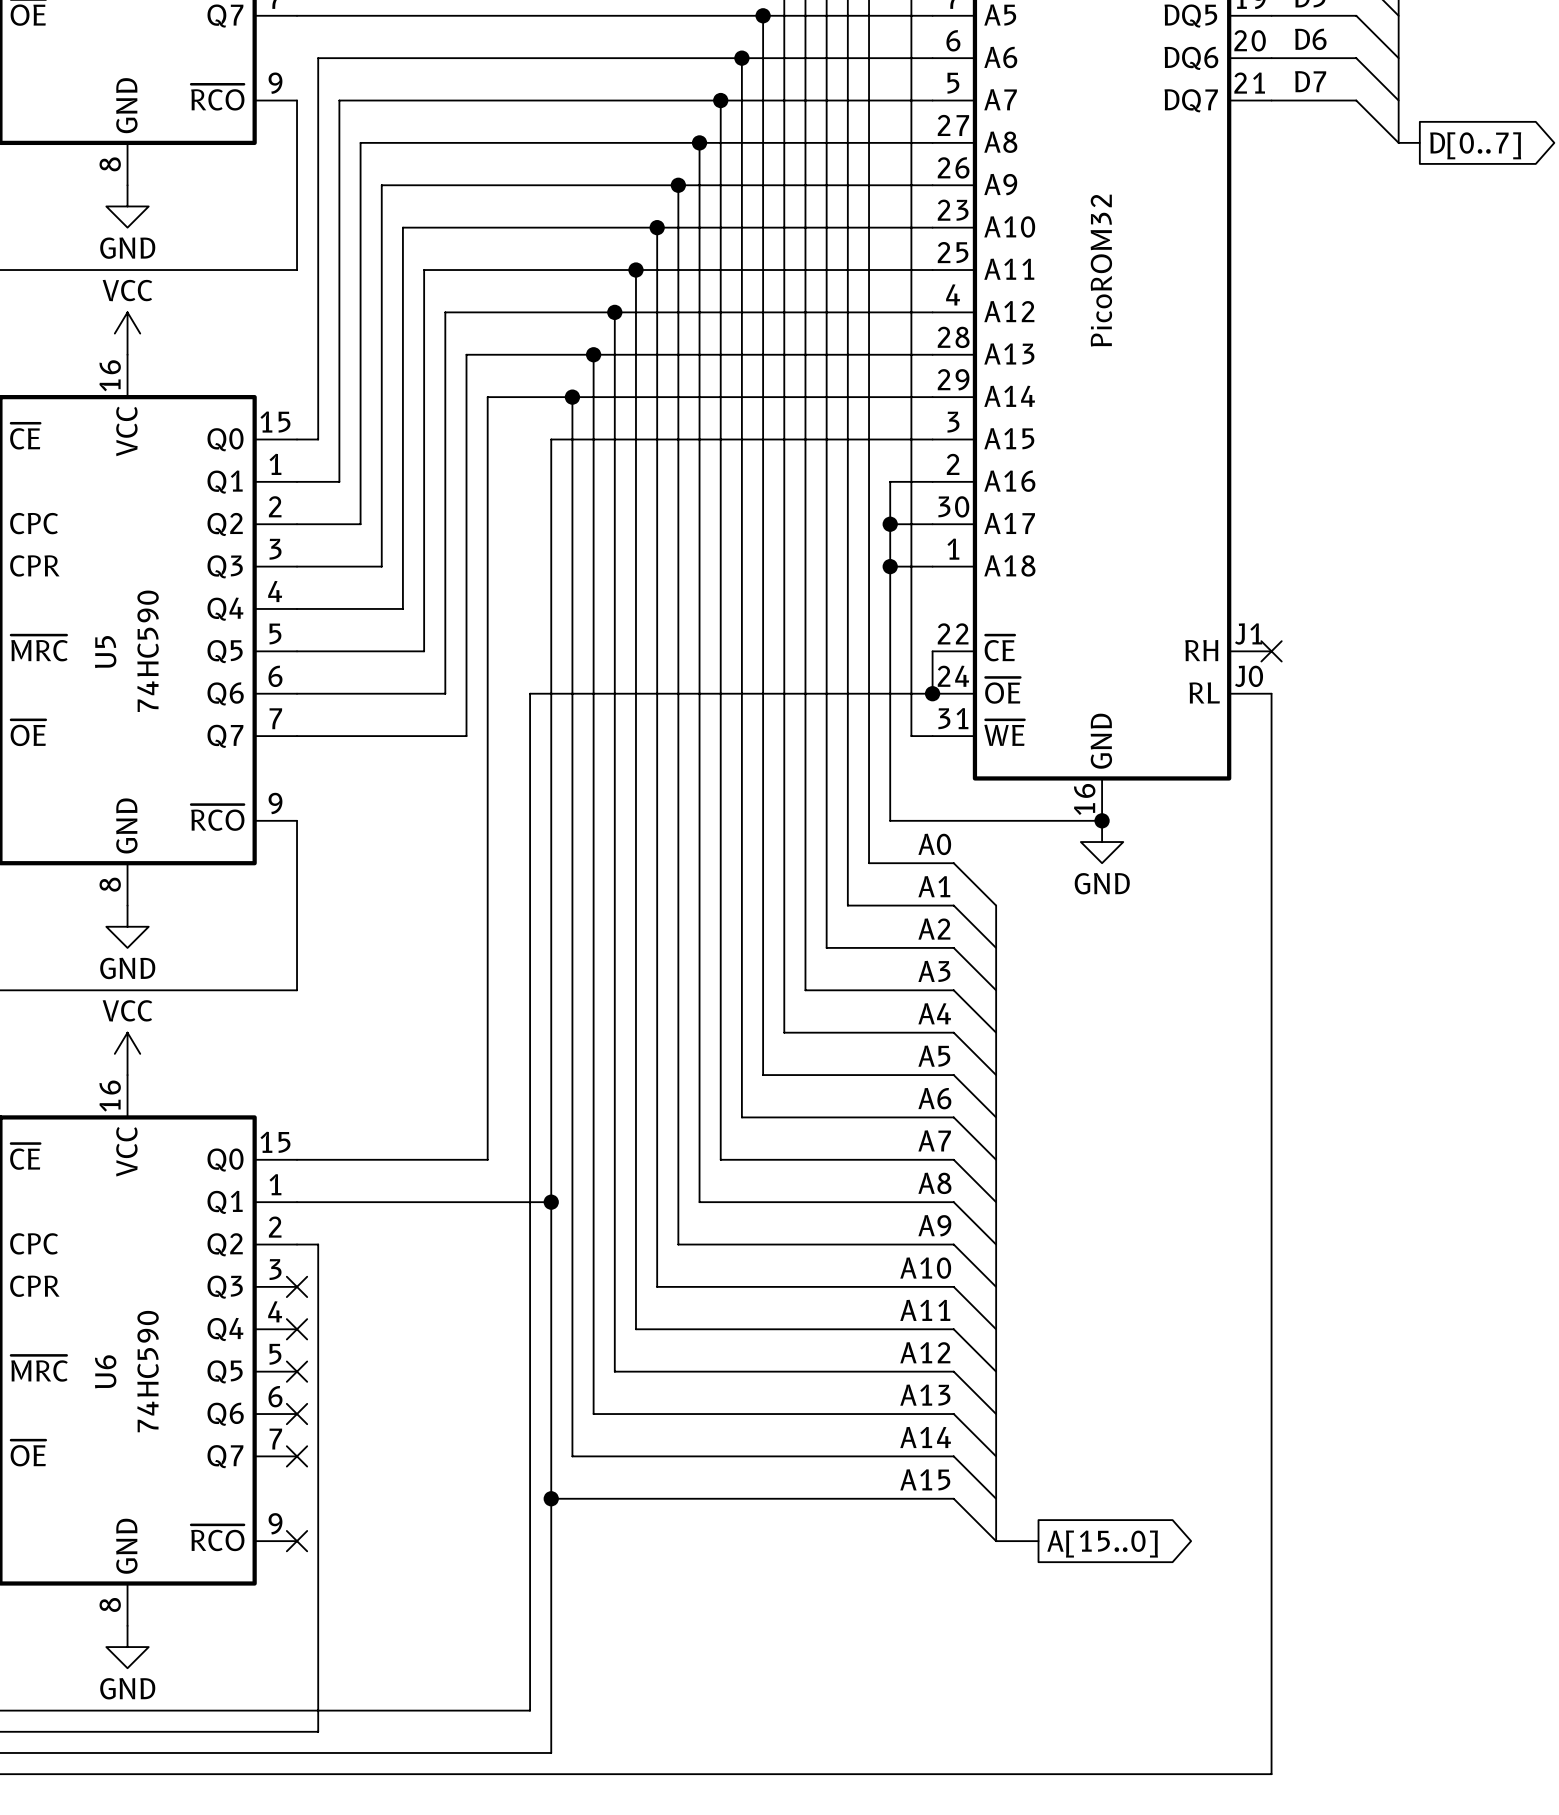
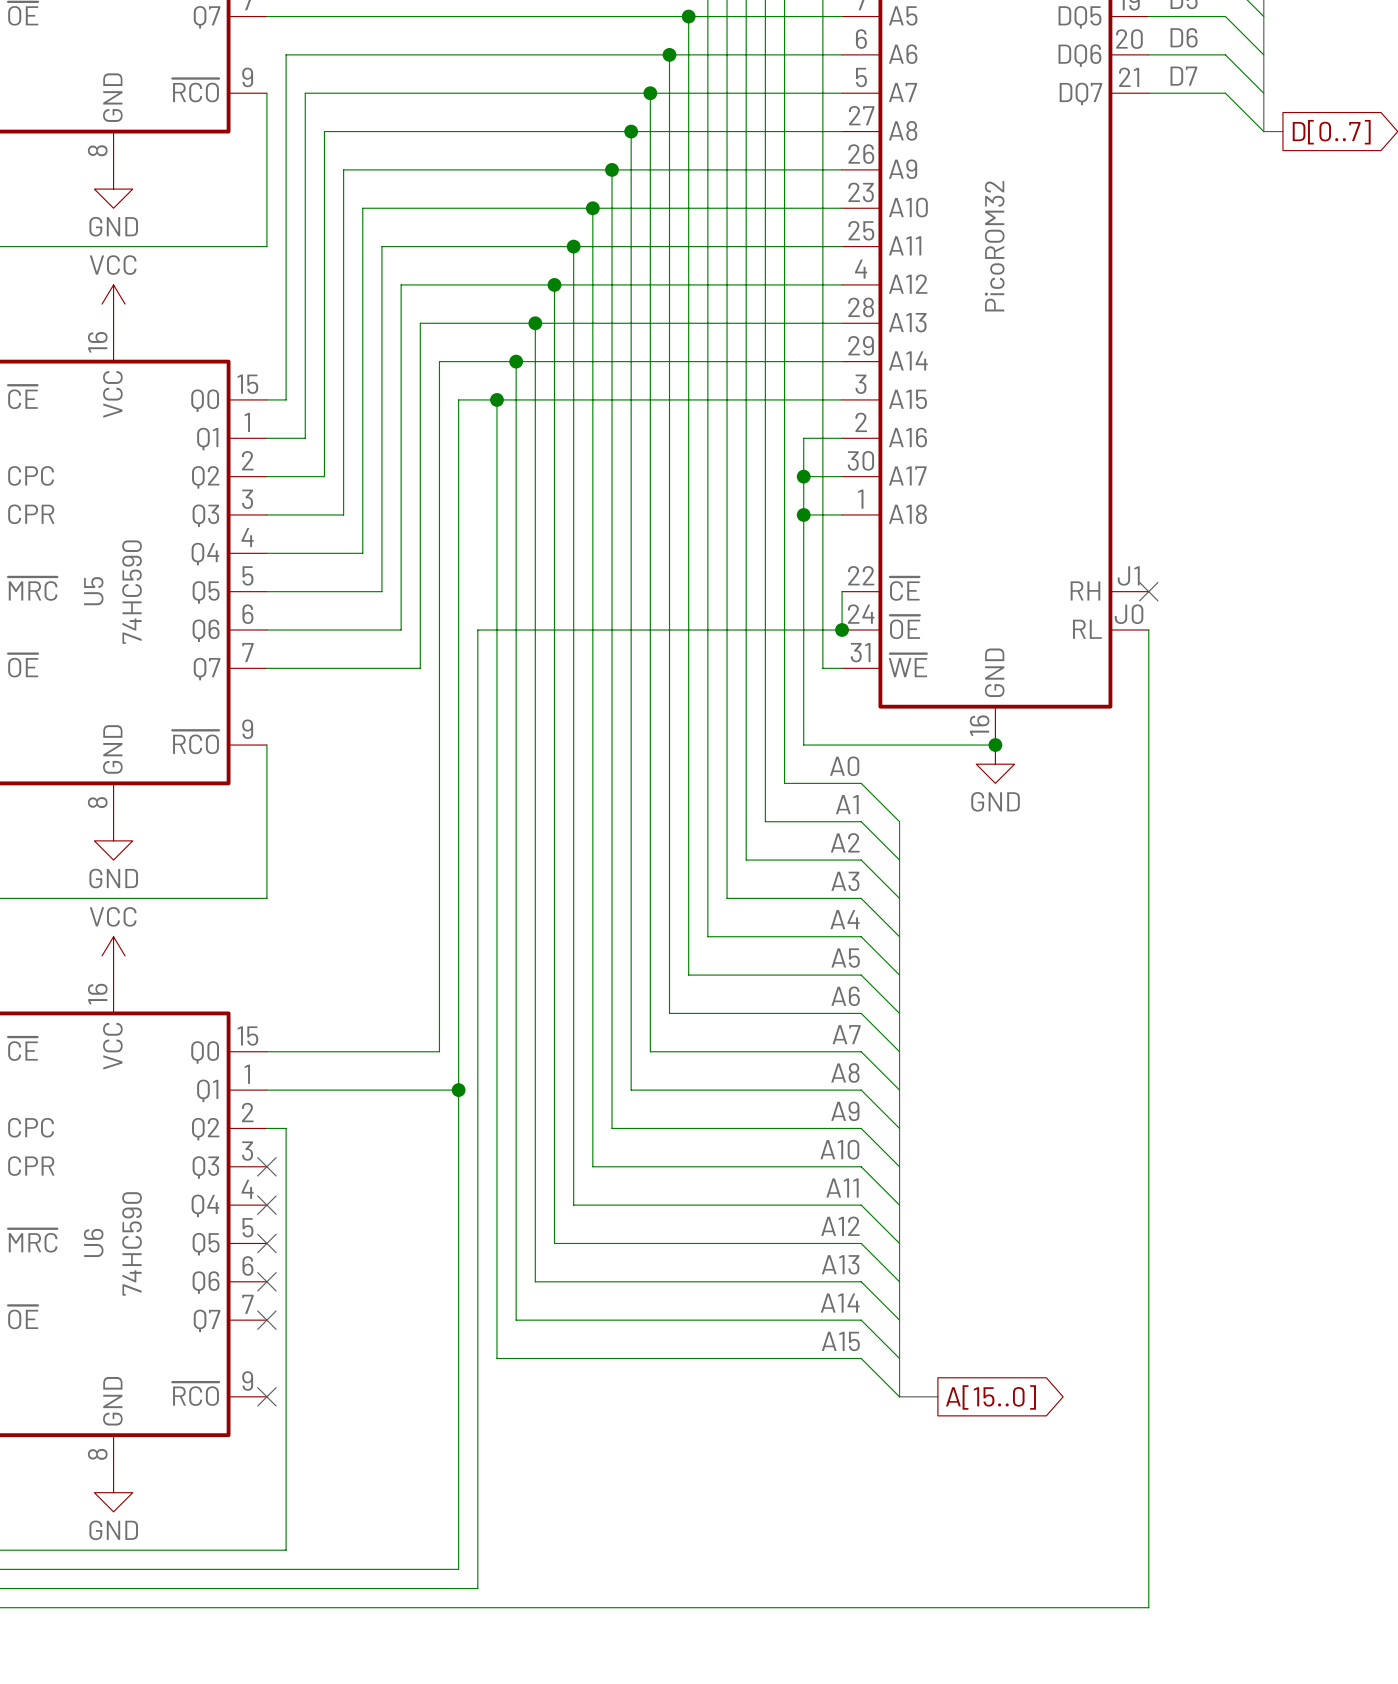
wire: none -> (496, 399) (458, 399) (458, 1569) (286, 1569)
junction: none -> (496, 399)
wire: (508, 1202) (551, 1202) -> none
junction position: (551, 1202) -> (458, 1090)
wire: (551, 1498) (551, 1752) (530, 1752) -> none
junction: (551, 1498) -> none
wire: (530, 1710) (318, 1710) (318, 1731) -> (477, 1550) (477, 1588)

